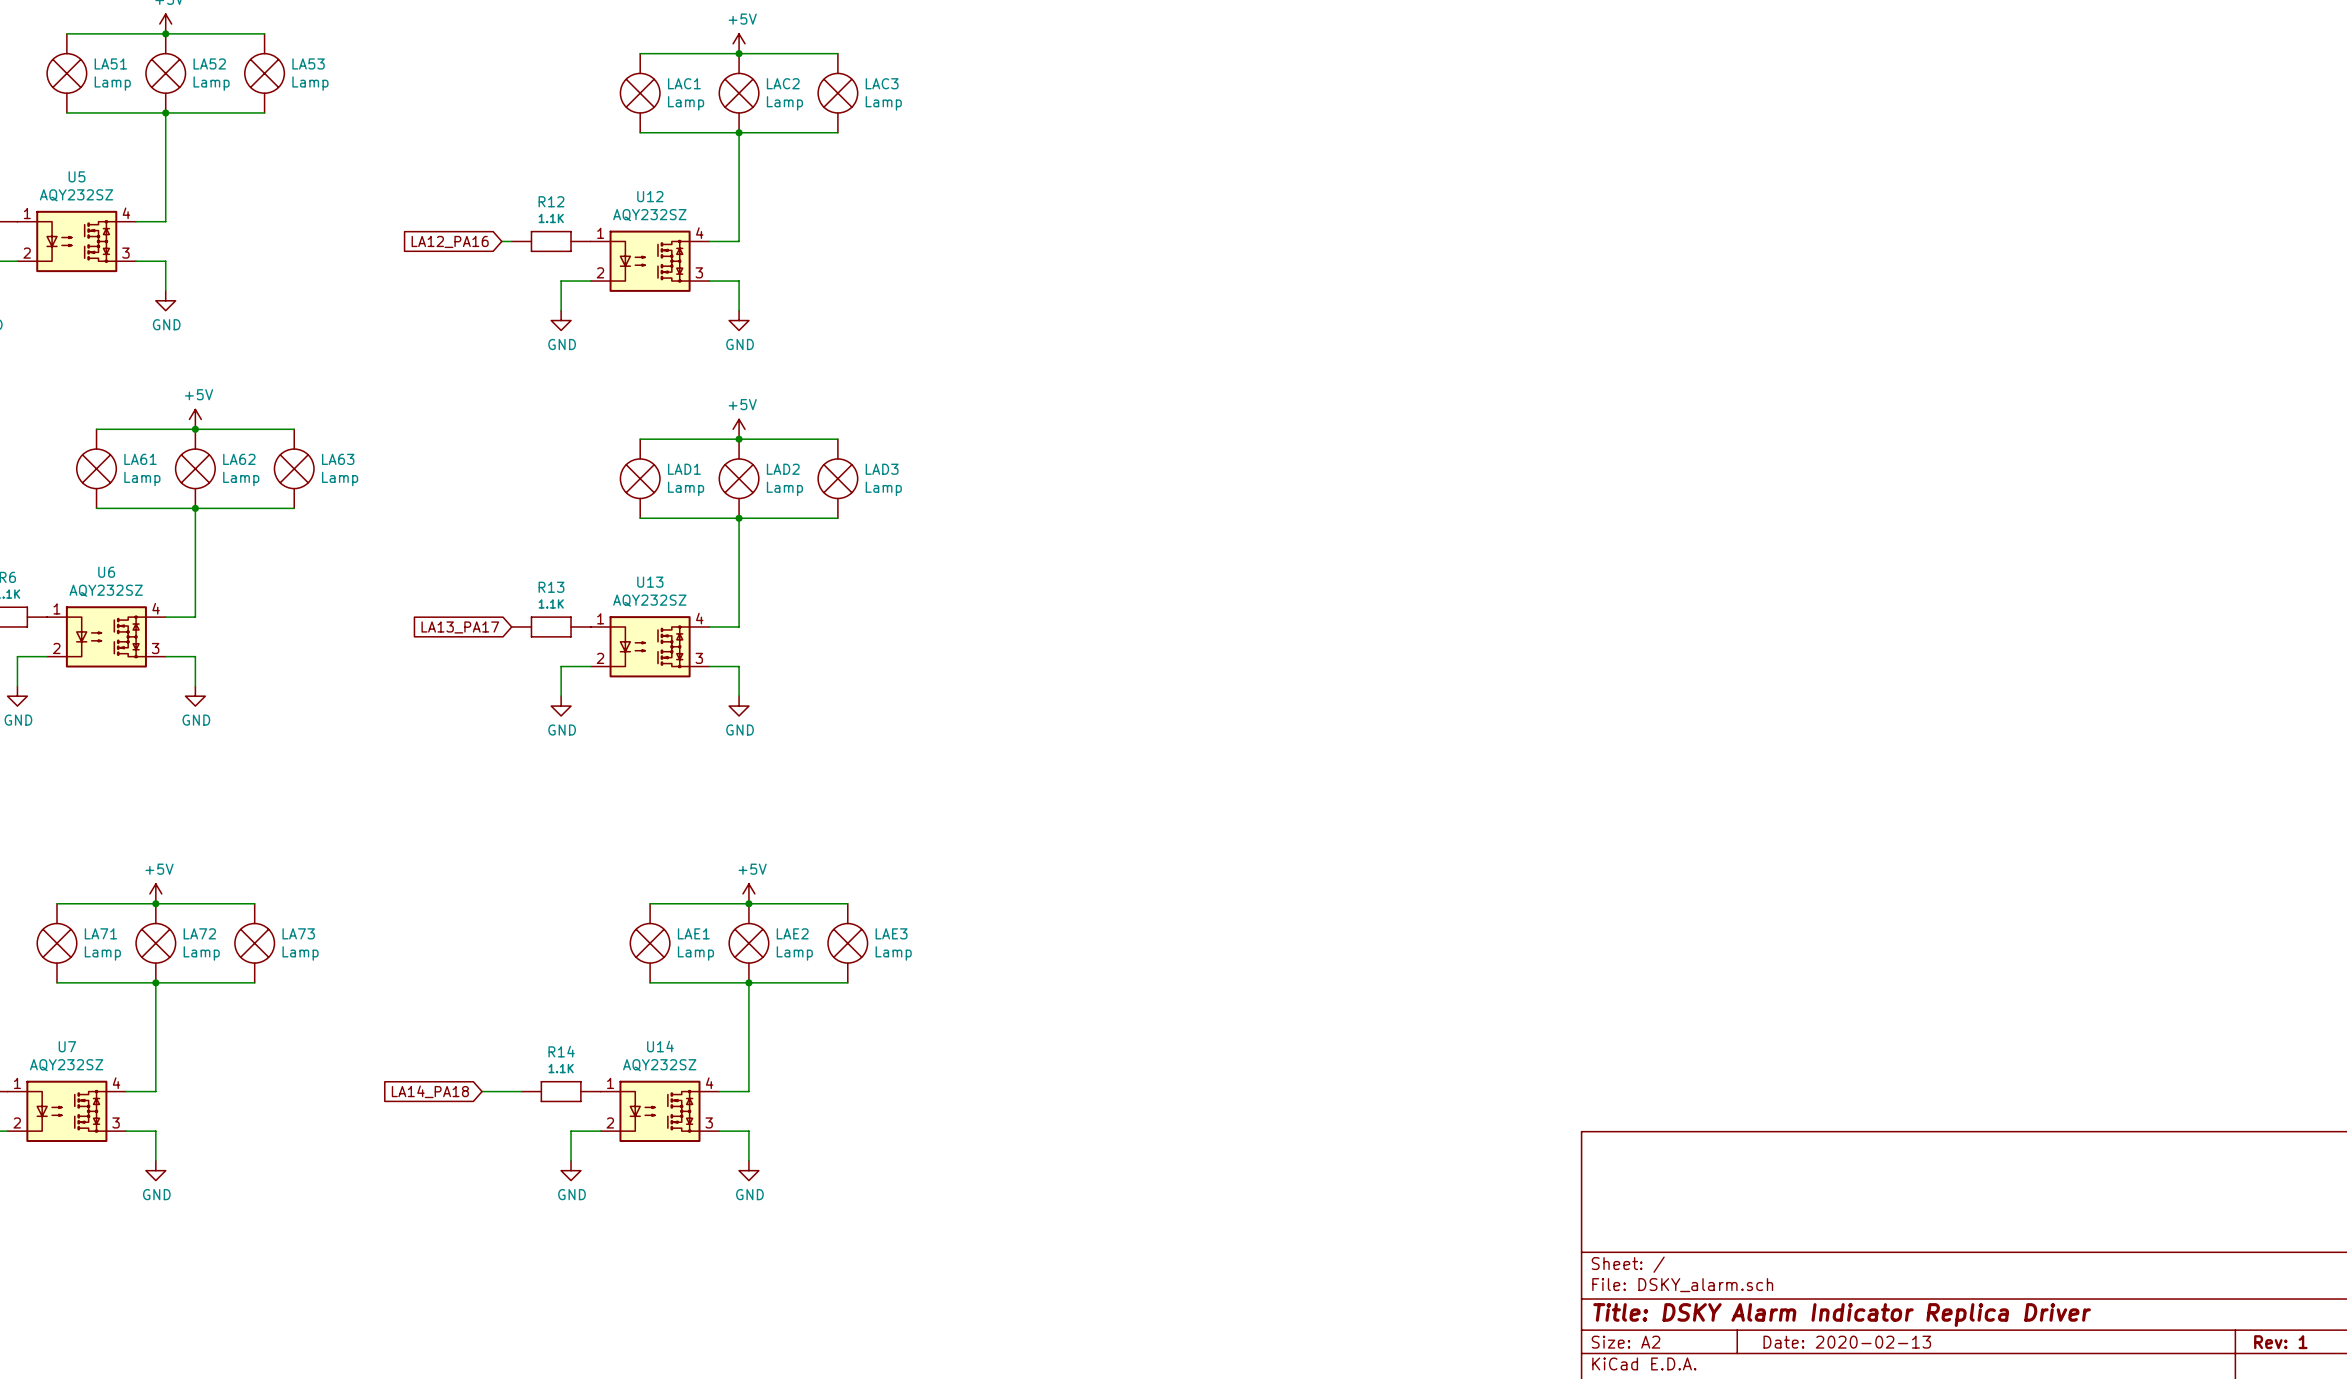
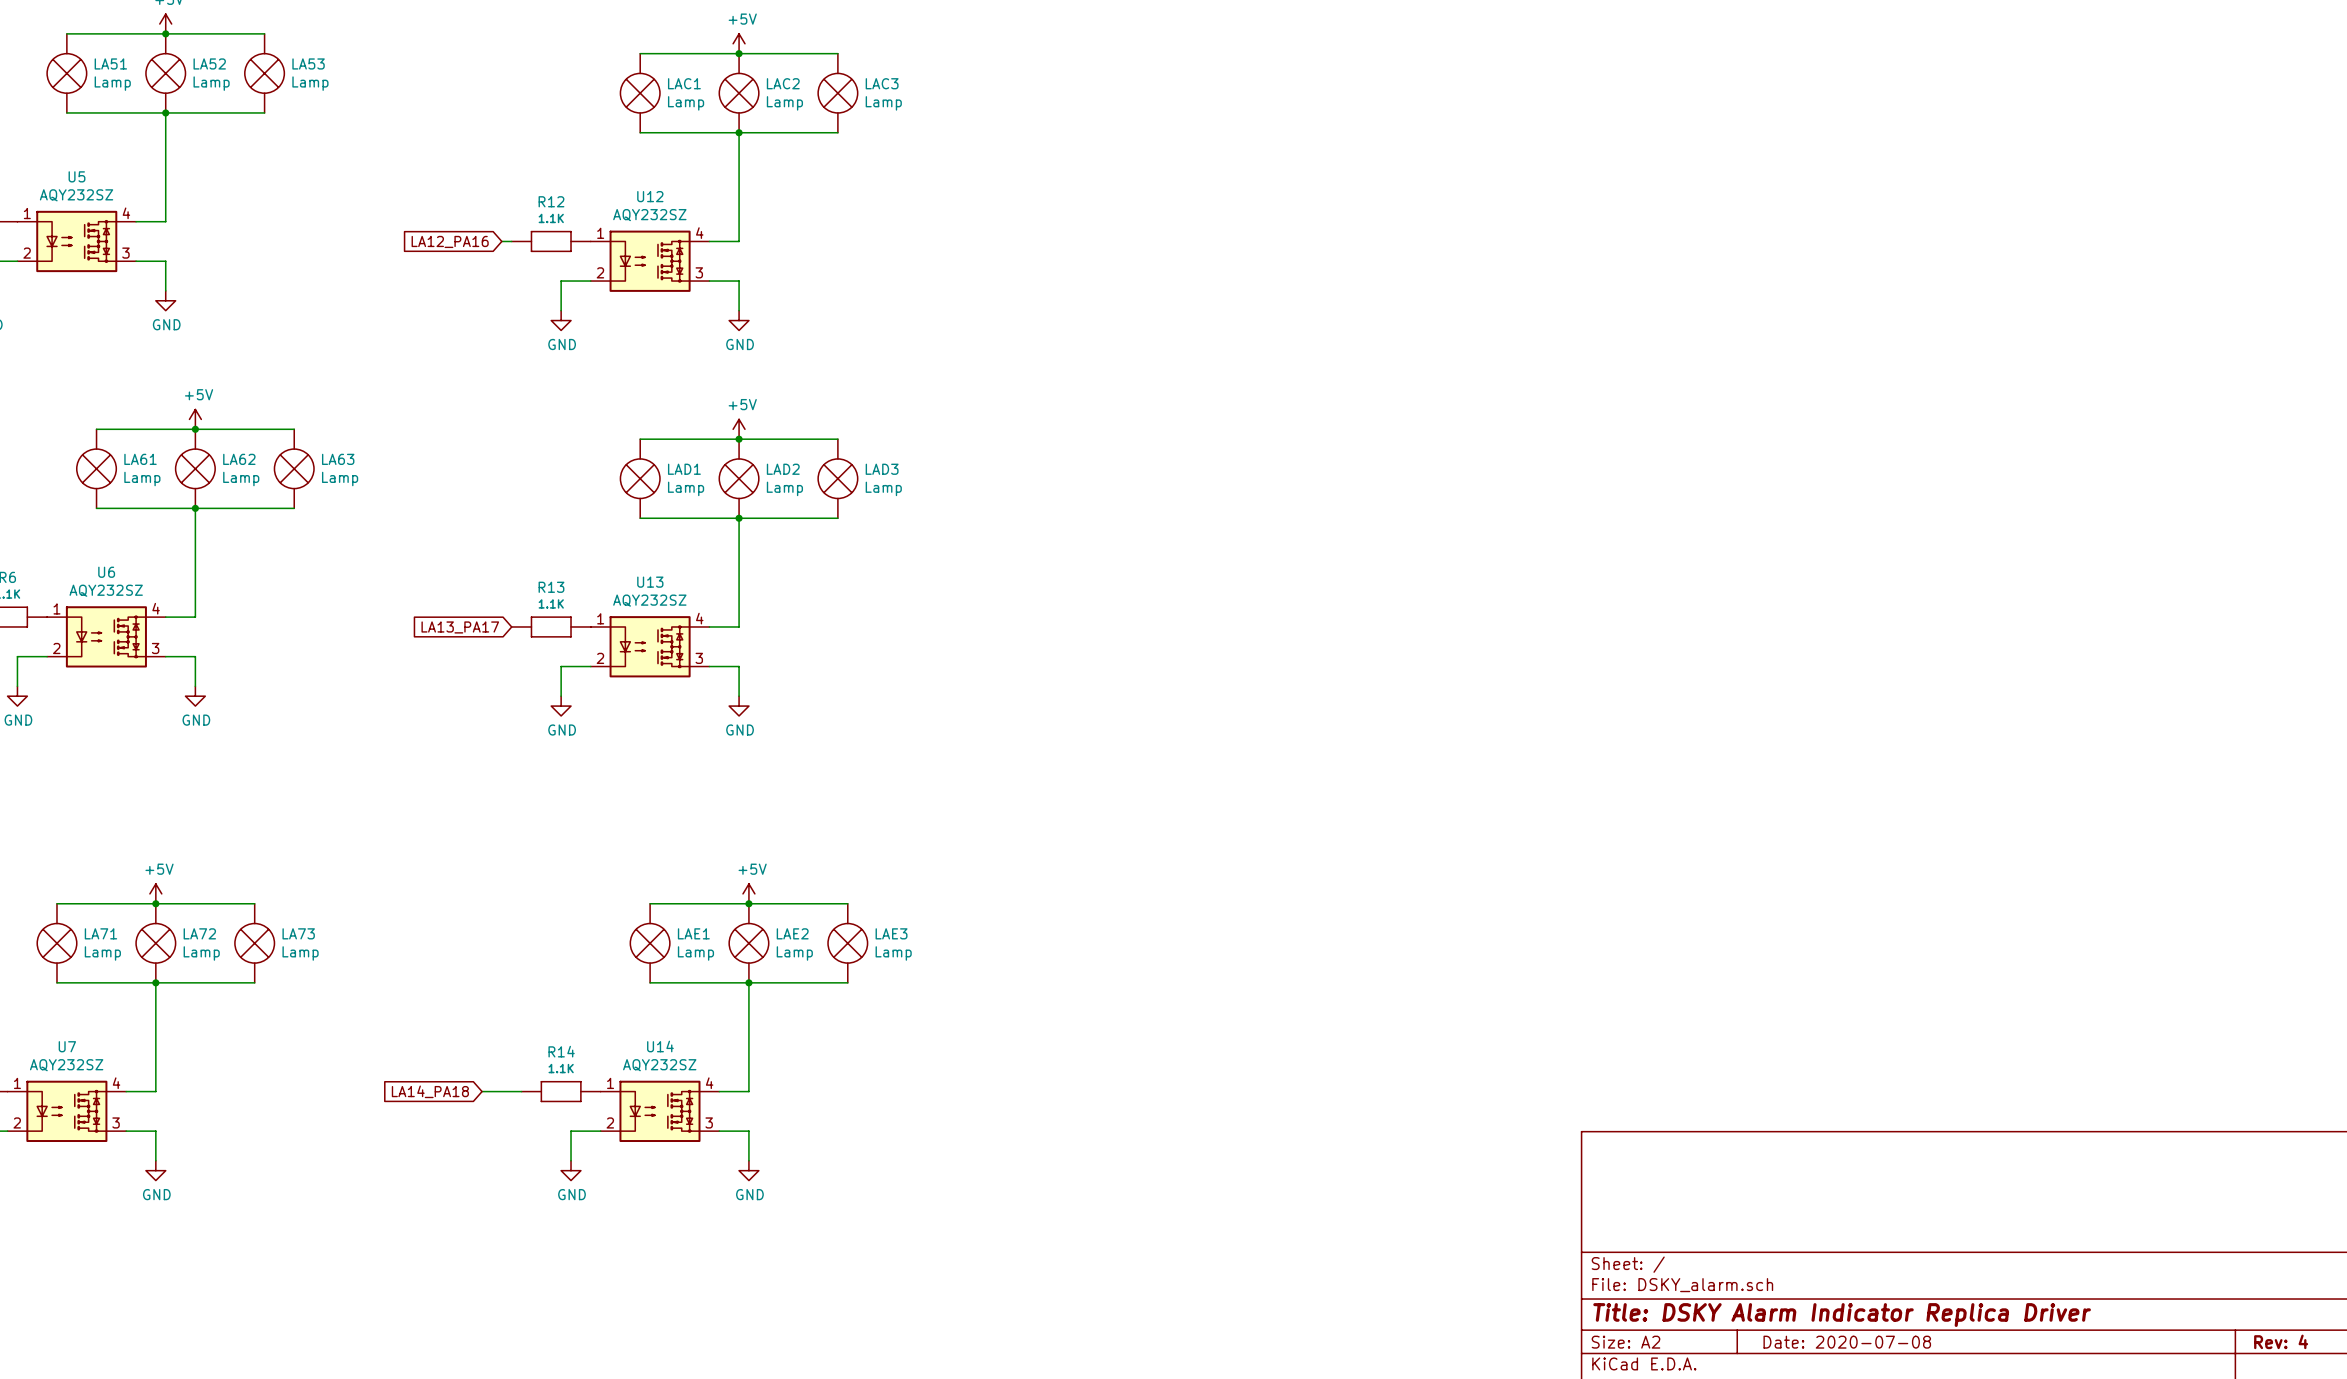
title block: Date: 2020-02-13 (1847, 1342) -> Date: 2020-07-08 (1847, 1342)
title block: Rev: 1 (2280, 1342) -> Rev: 4 (2281, 1341)

